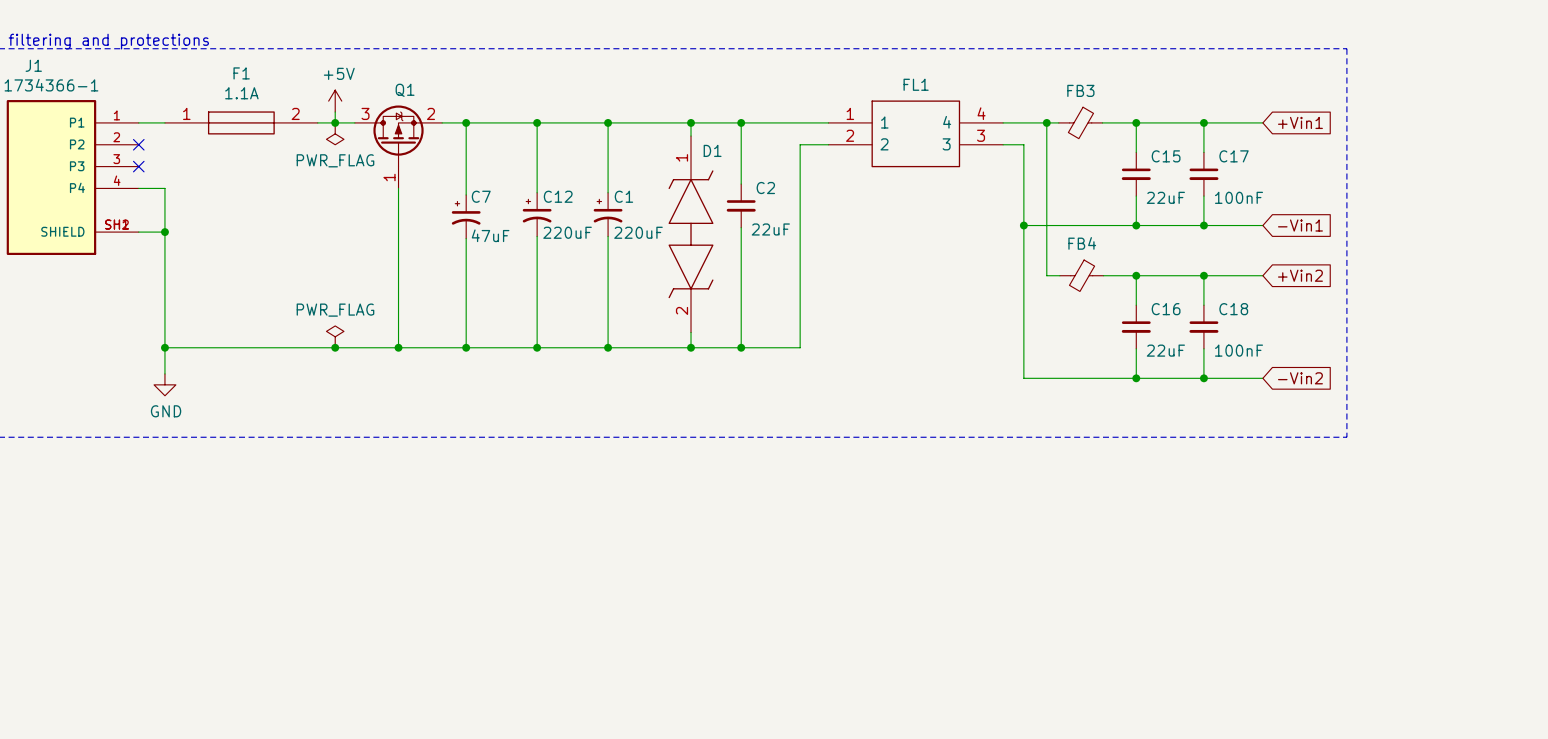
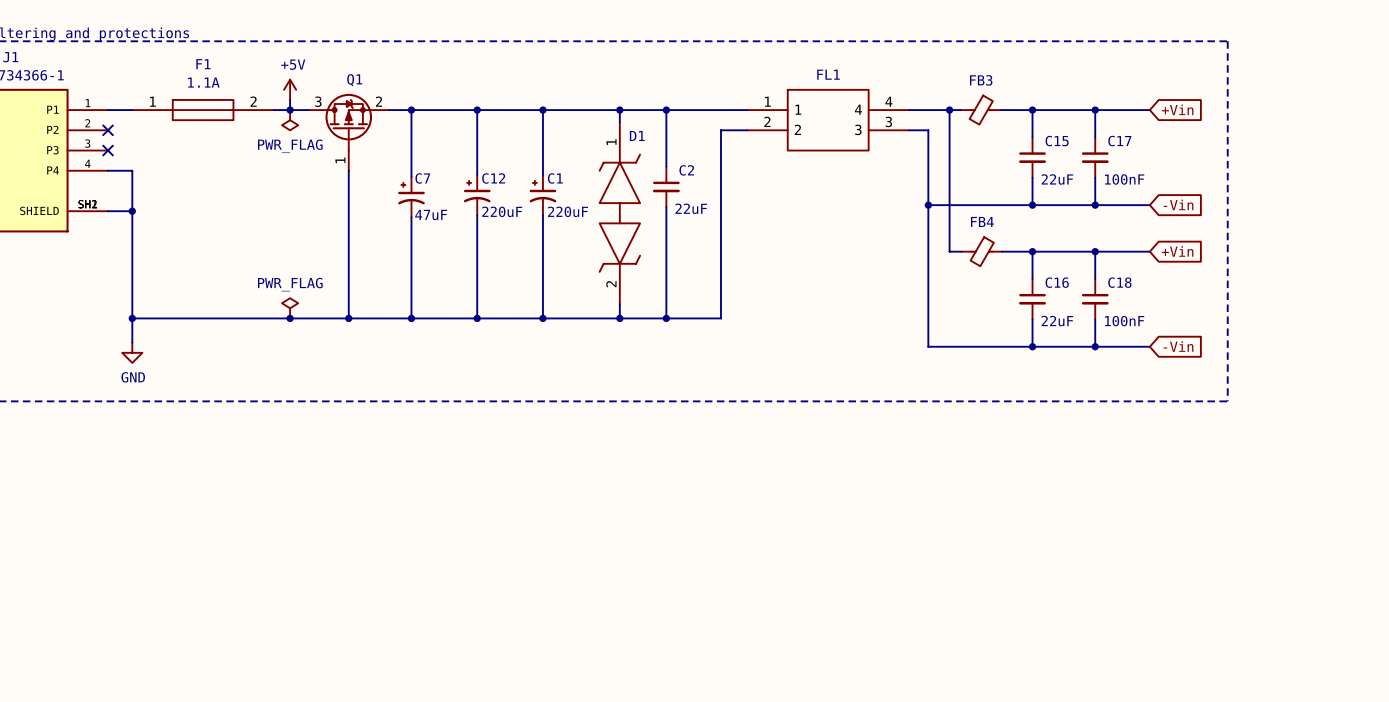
global label: +Vin1 (1300, 122) -> +Vin (1177, 109)
global label: -Vin1 (1300, 225) -> -Vin (1178, 204)
global label: +Vin2 (1300, 275) -> +Vin (1177, 251)
global label: -Vin2 (1300, 378) -> -Vin (1178, 346)

